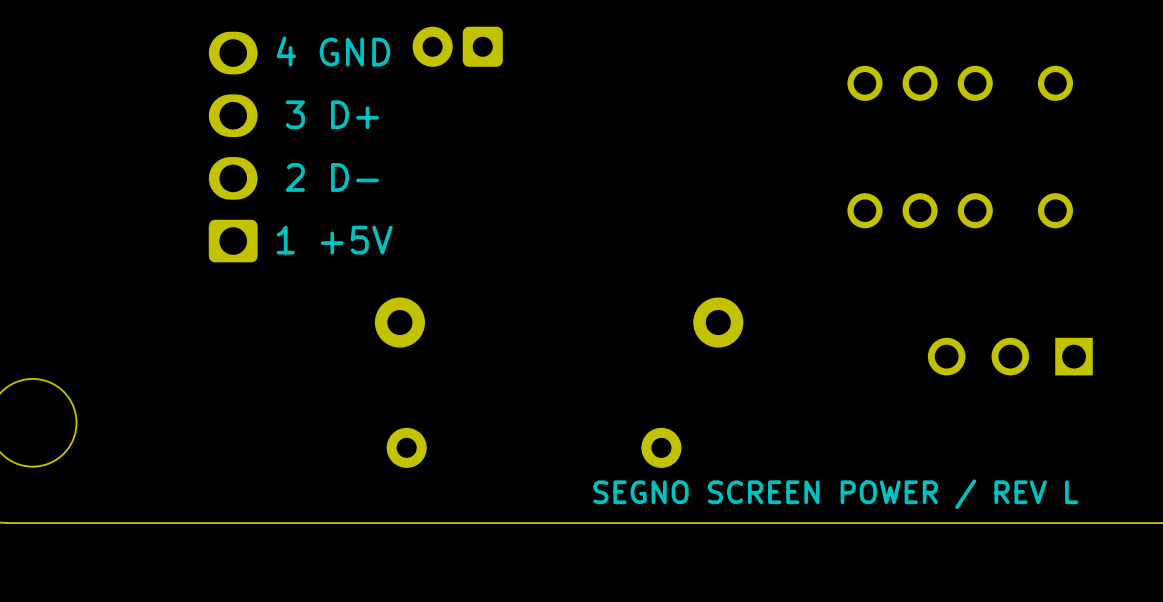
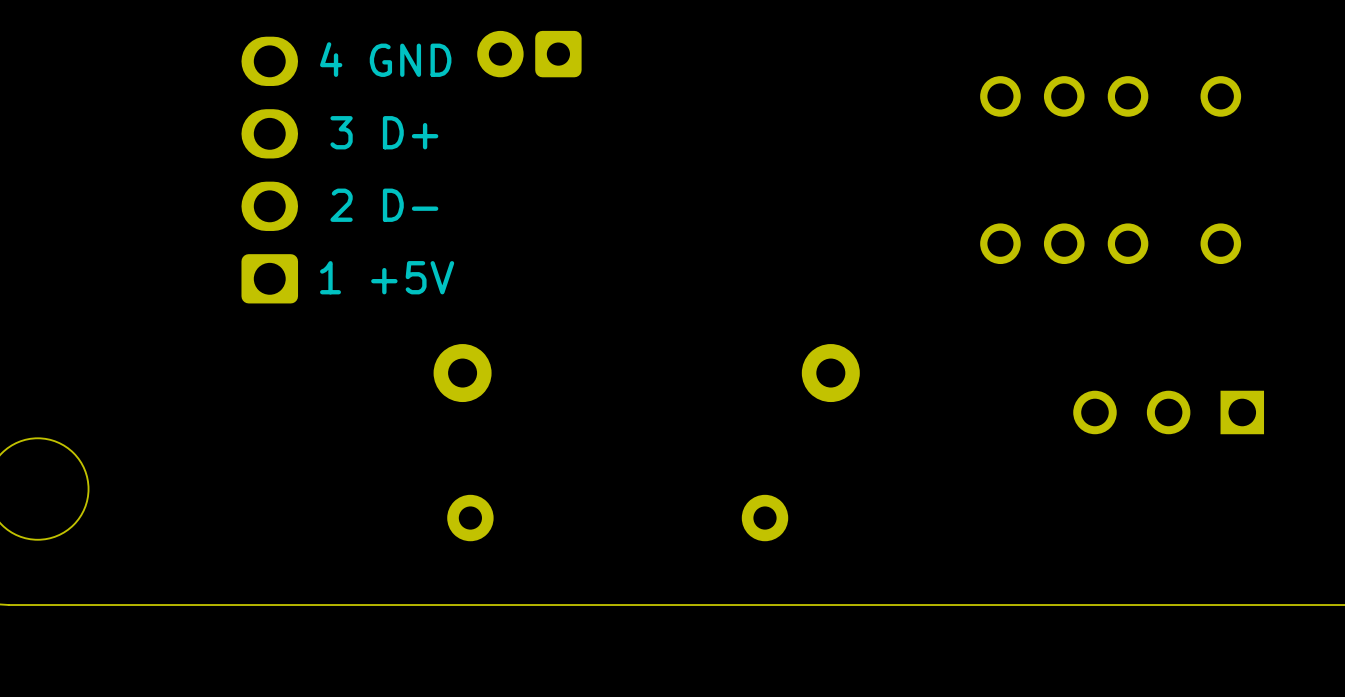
text: SEGNO SCREEN POWER / REV L (835, 494) -> none

